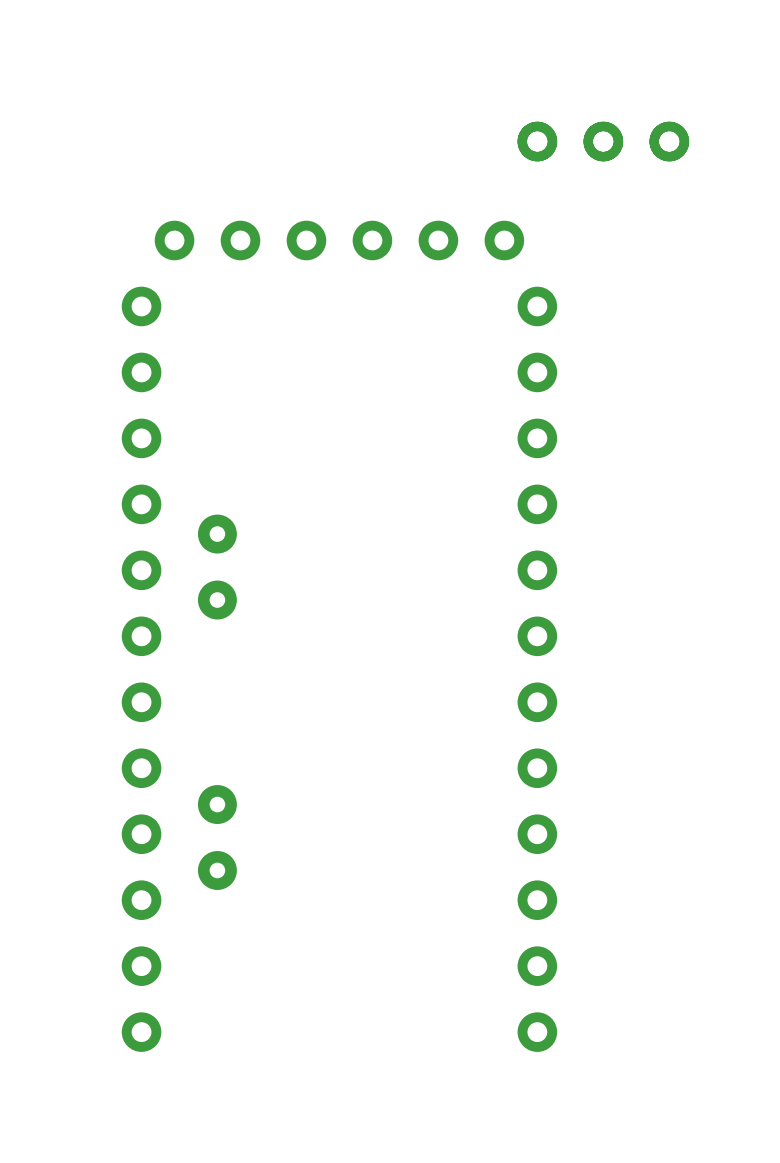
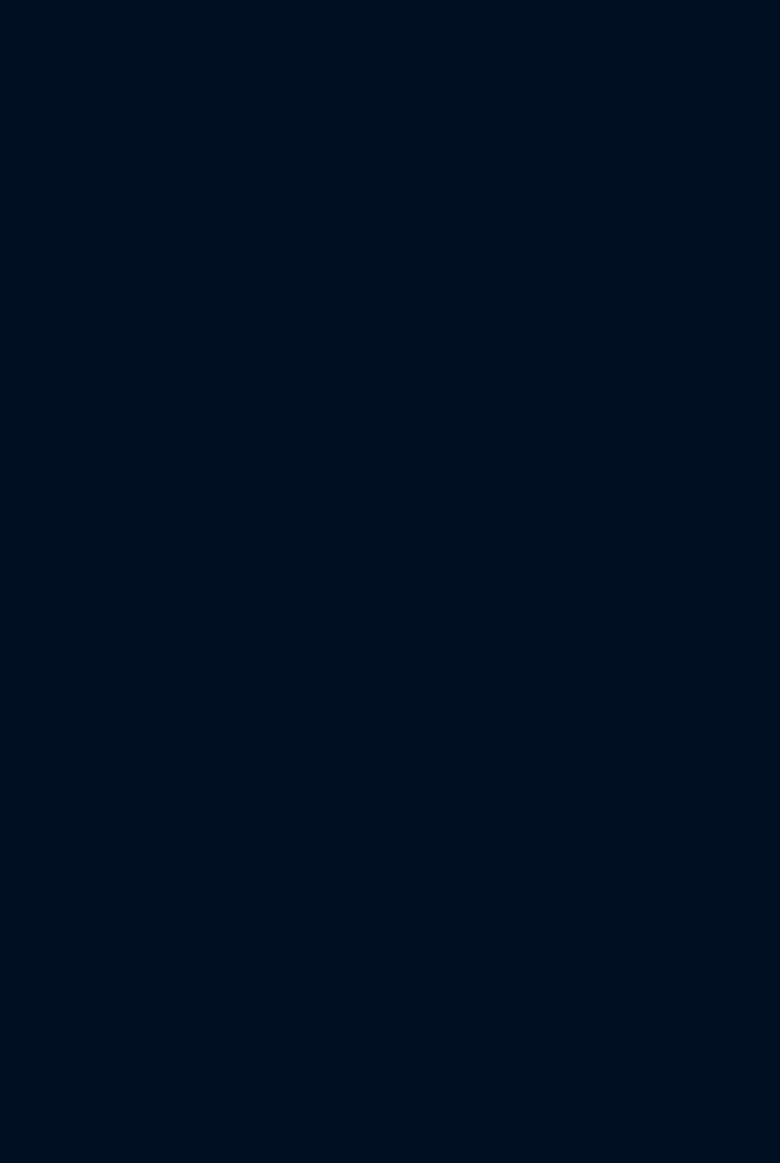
part: (603, 141) -> none
part: (339, 636) -> none

